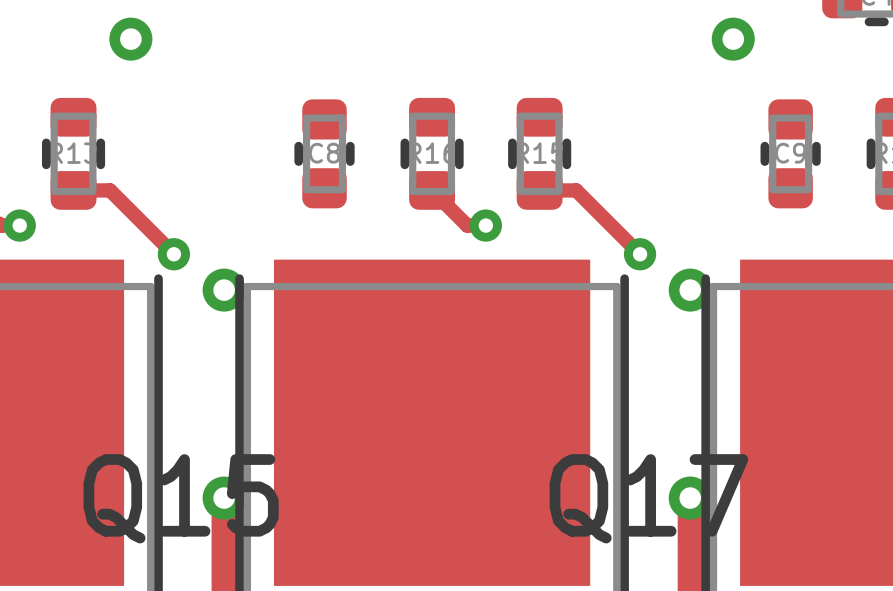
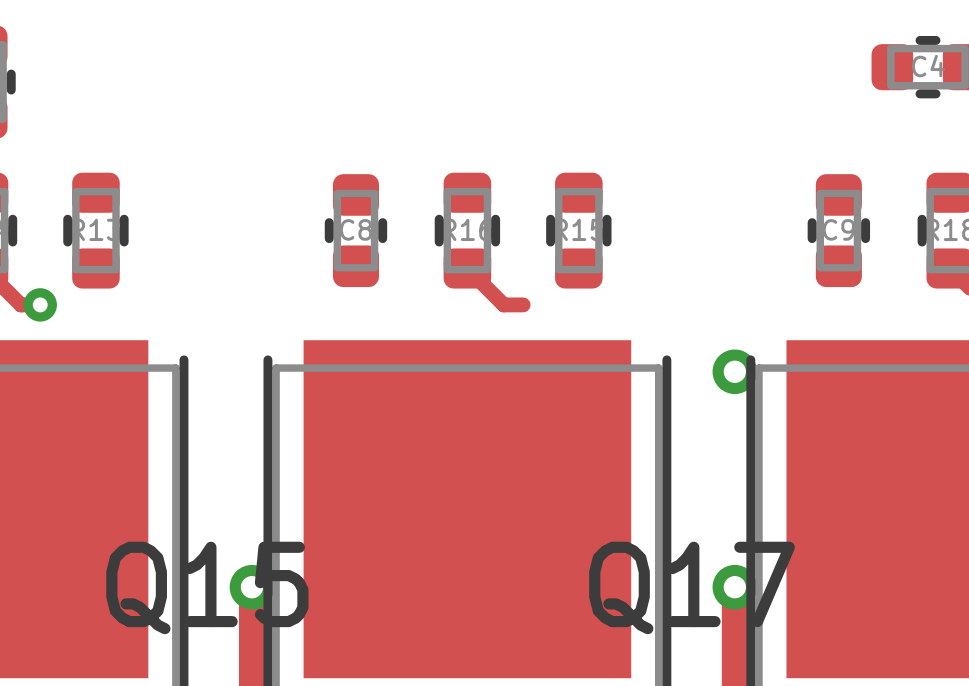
via: (130, 39) -> none
via: (733, 39) -> none
track: (73, 190) (110, 190) (173, 254) -> none
track: (539, 190) (576, 190) (640, 254) -> none
via: (485, 225) -> none
via: (173, 254) -> none
via: (640, 254) -> none
via: (224, 290) -> none

